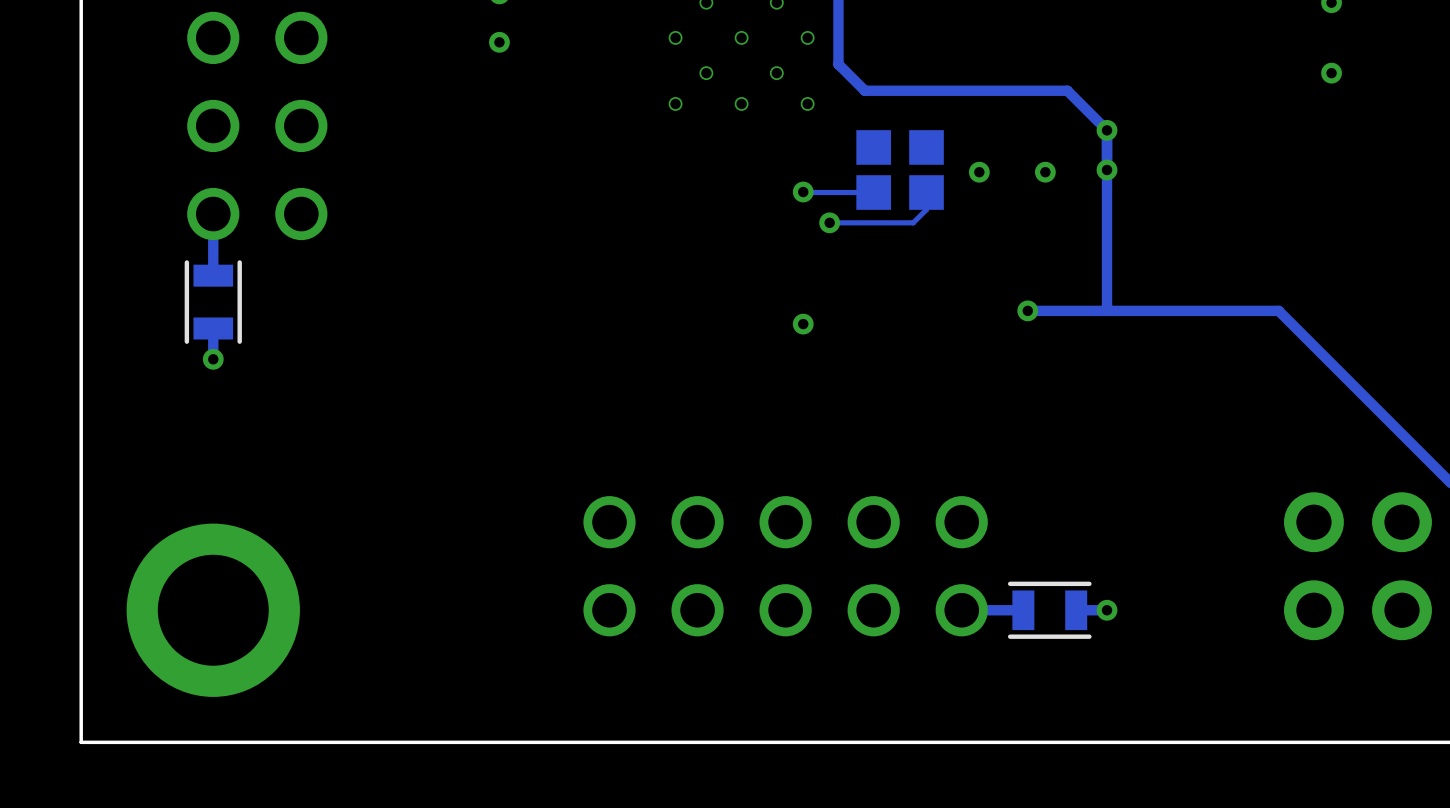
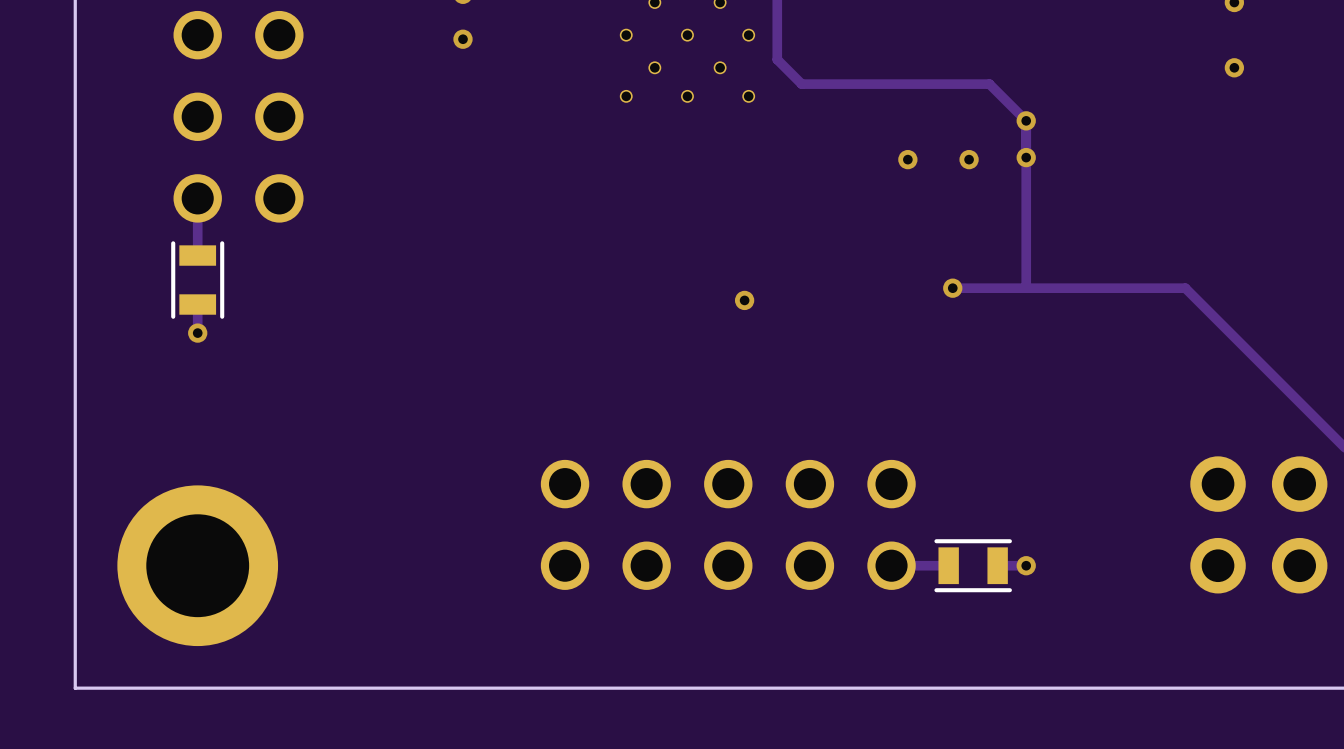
part: (873, 169) -> none
part: (926, 169) -> none
track: (803, 192) (873, 192) -> none
via: (803, 192) -> none
track: (926, 192) (926, 209) (913, 222) (829, 222) -> none
via: (829, 222) -> none

